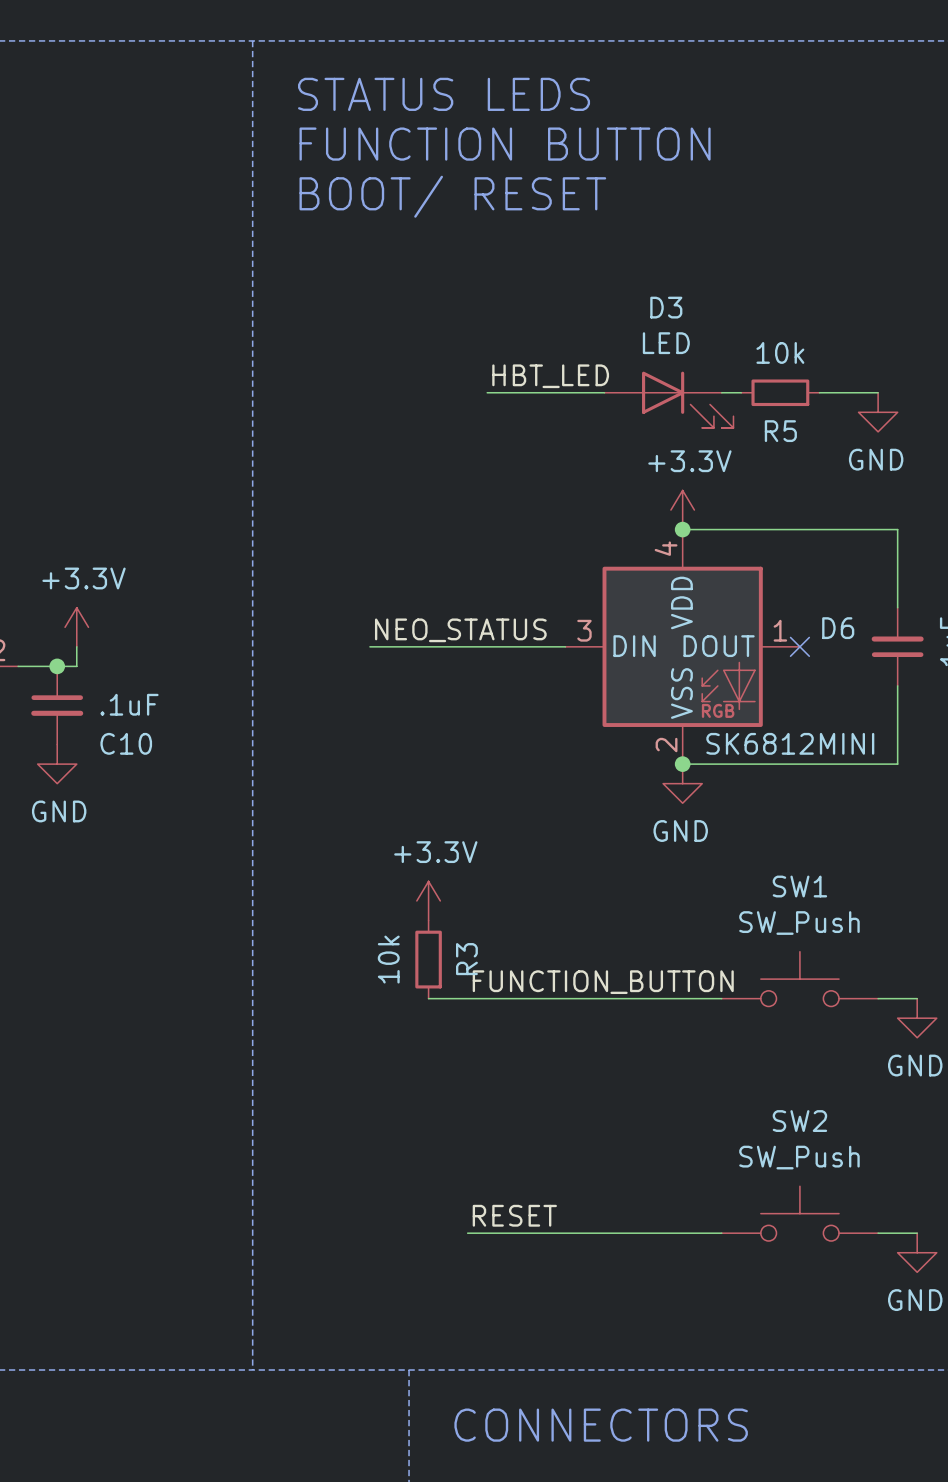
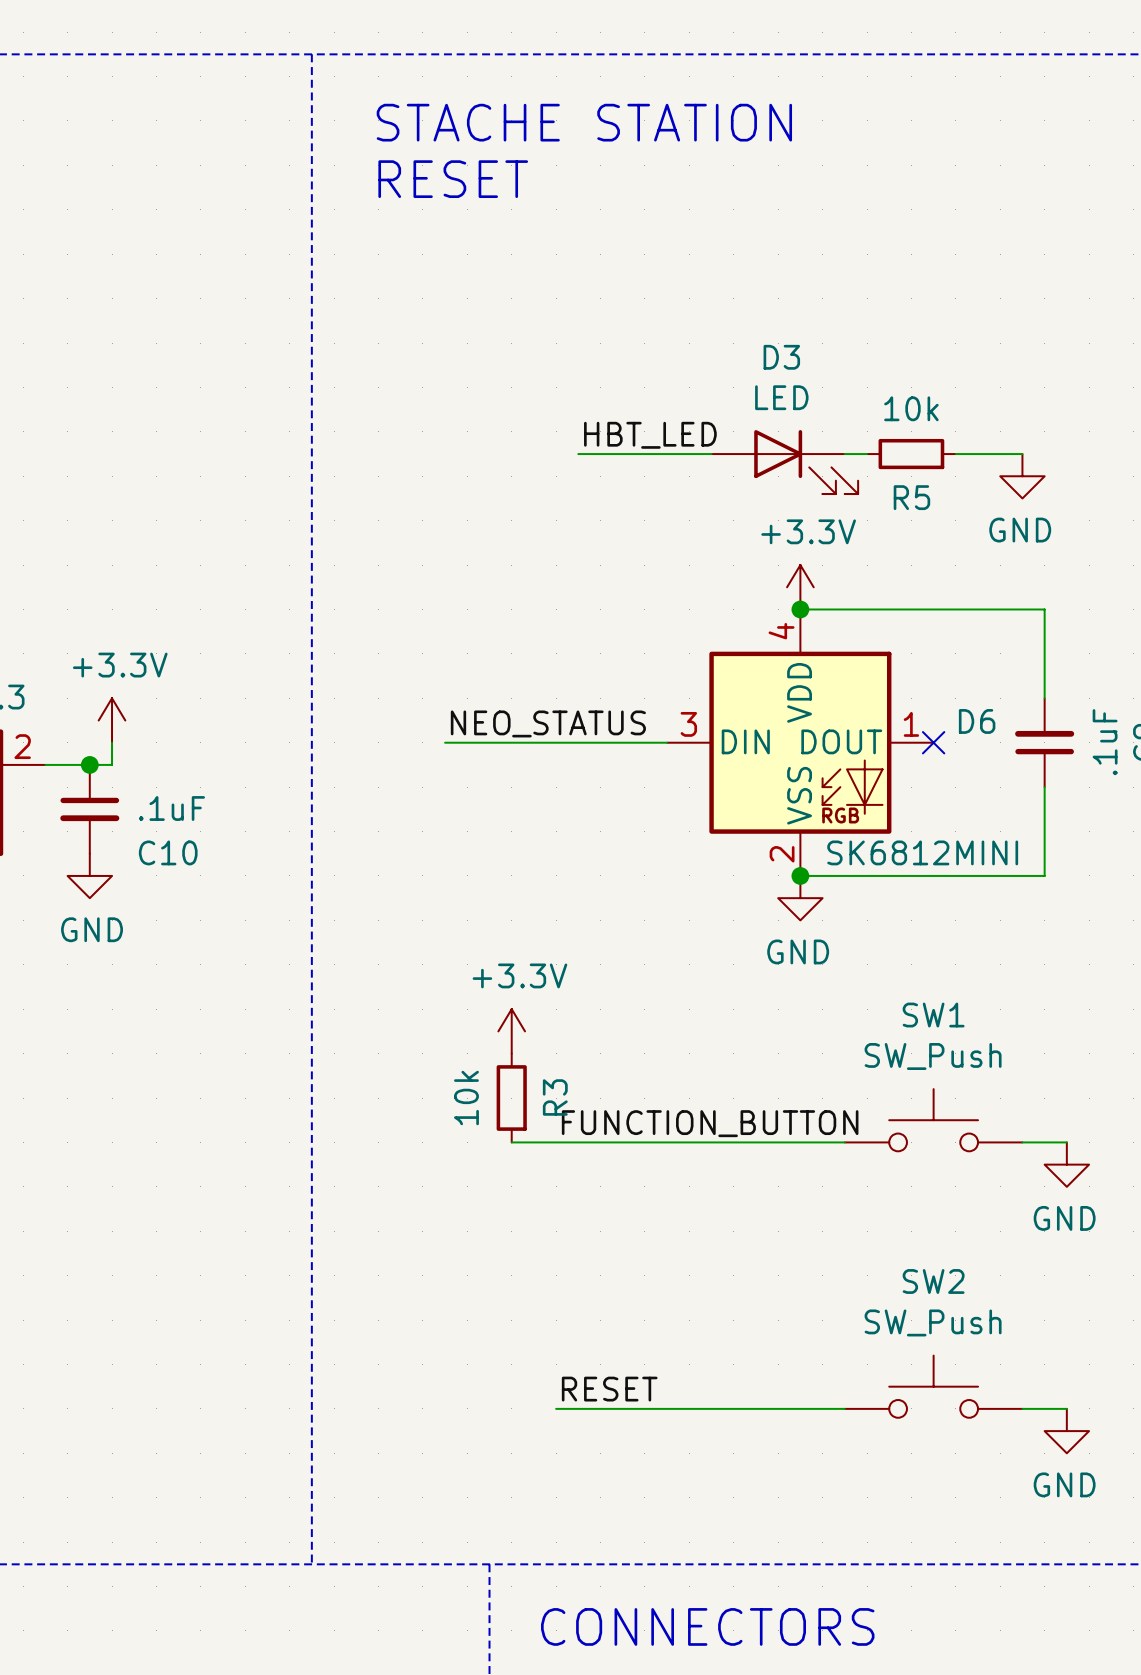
text: STATUS LEDS (444, 94) -> STACHE STATION (584, 122)
text: FUNCTION BUTTON (505, 144) -> RESET (453, 179)
text: BOOT/ RESET (452, 196) -> none

